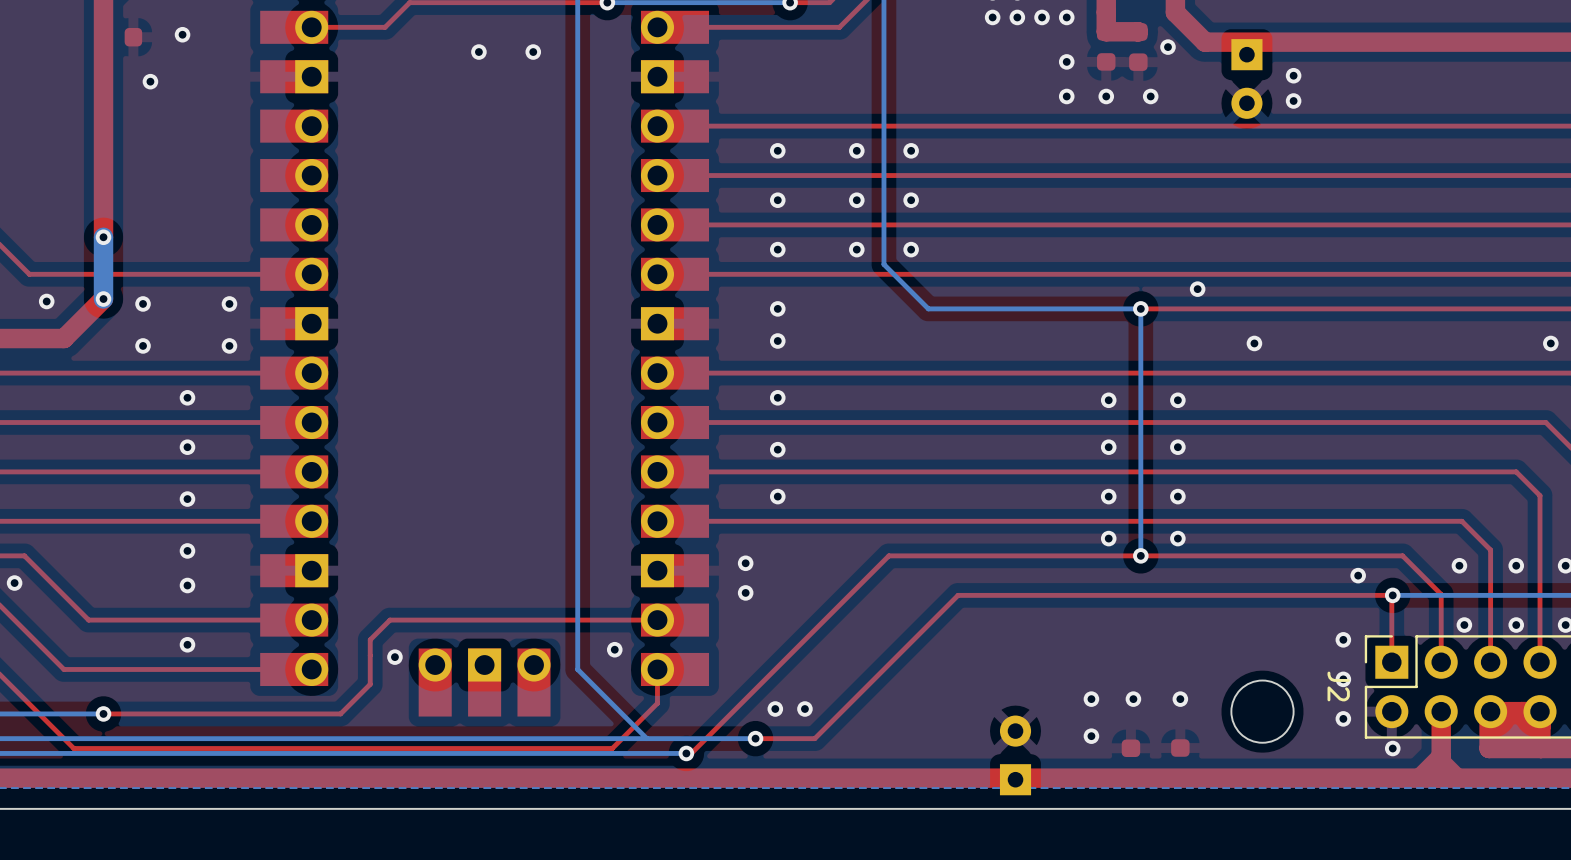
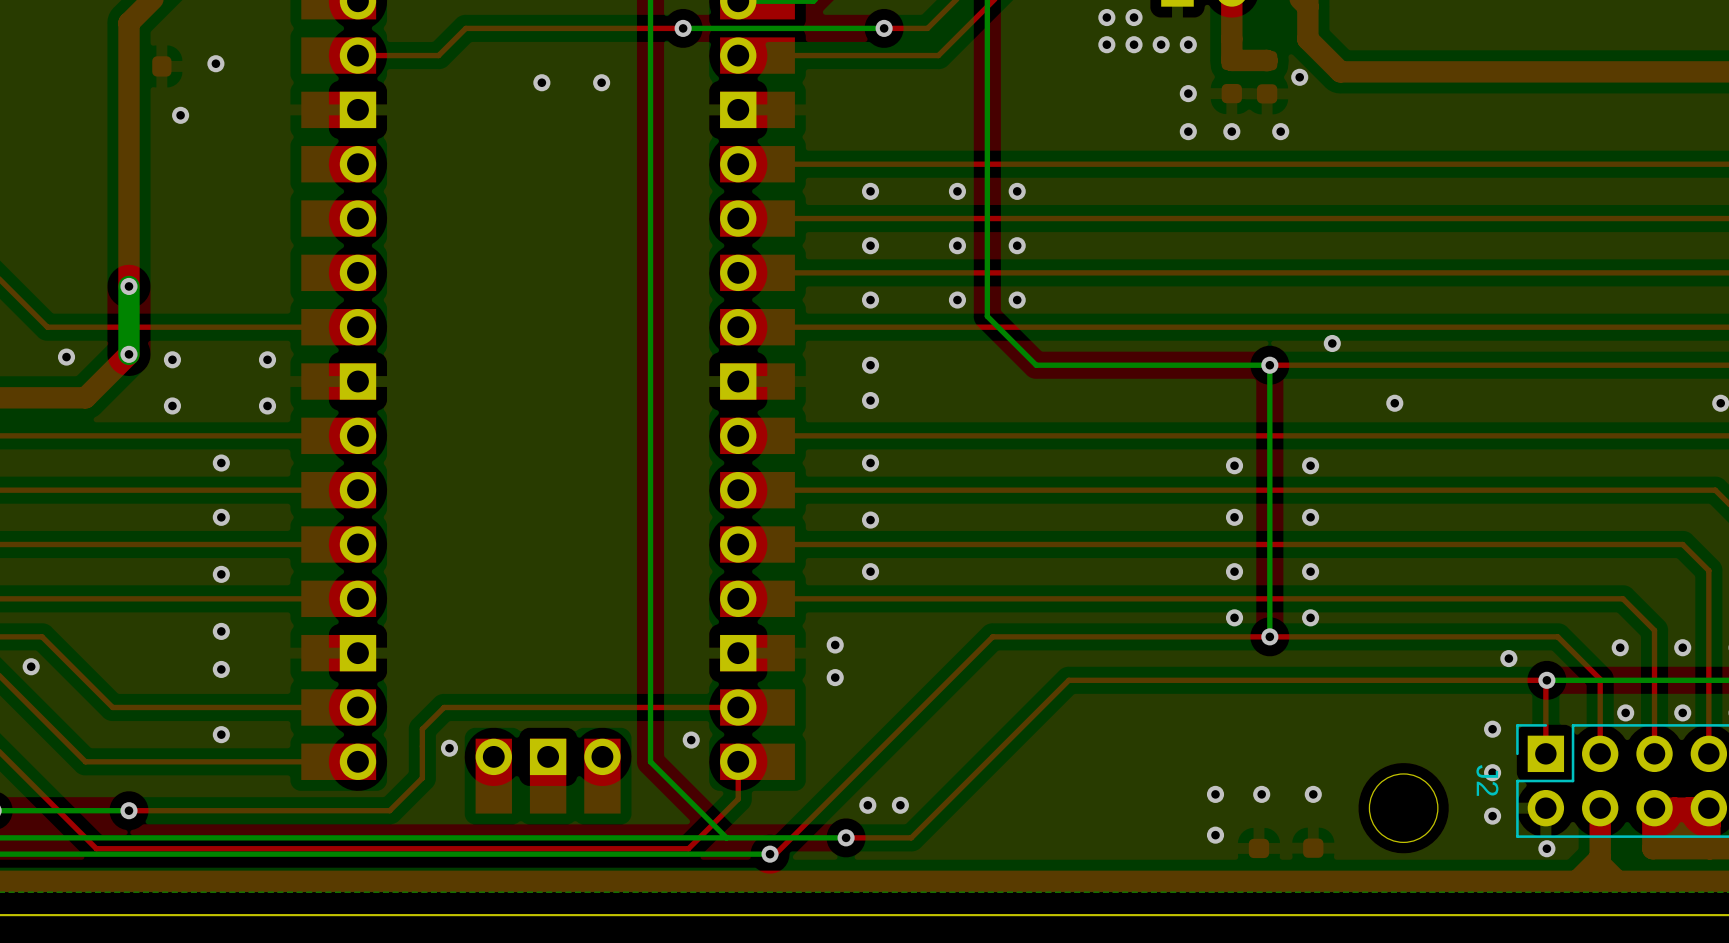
via: (1293, 75) -> none
part: (1246, 78) -> none
via: (1293, 101) -> none
part: (1015, 755) -> none

